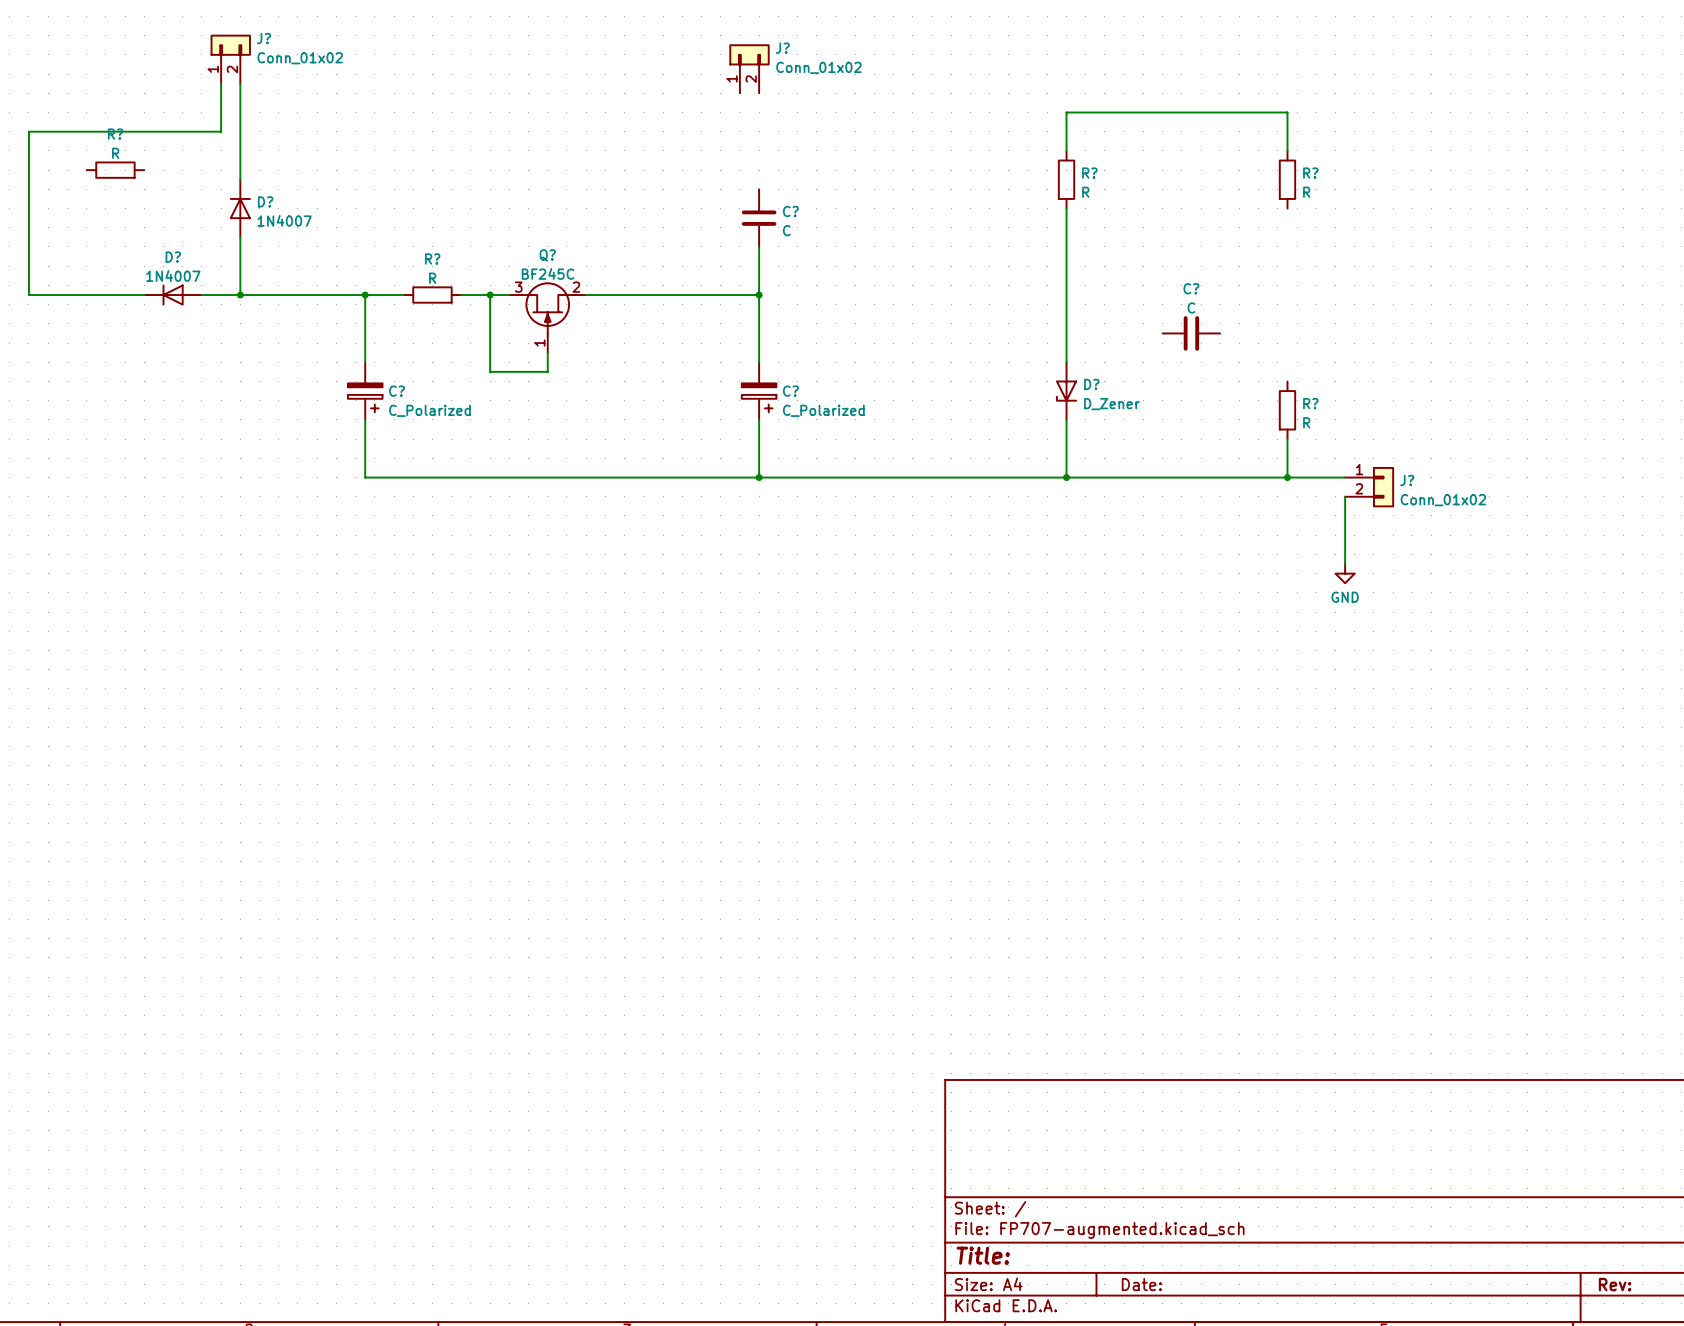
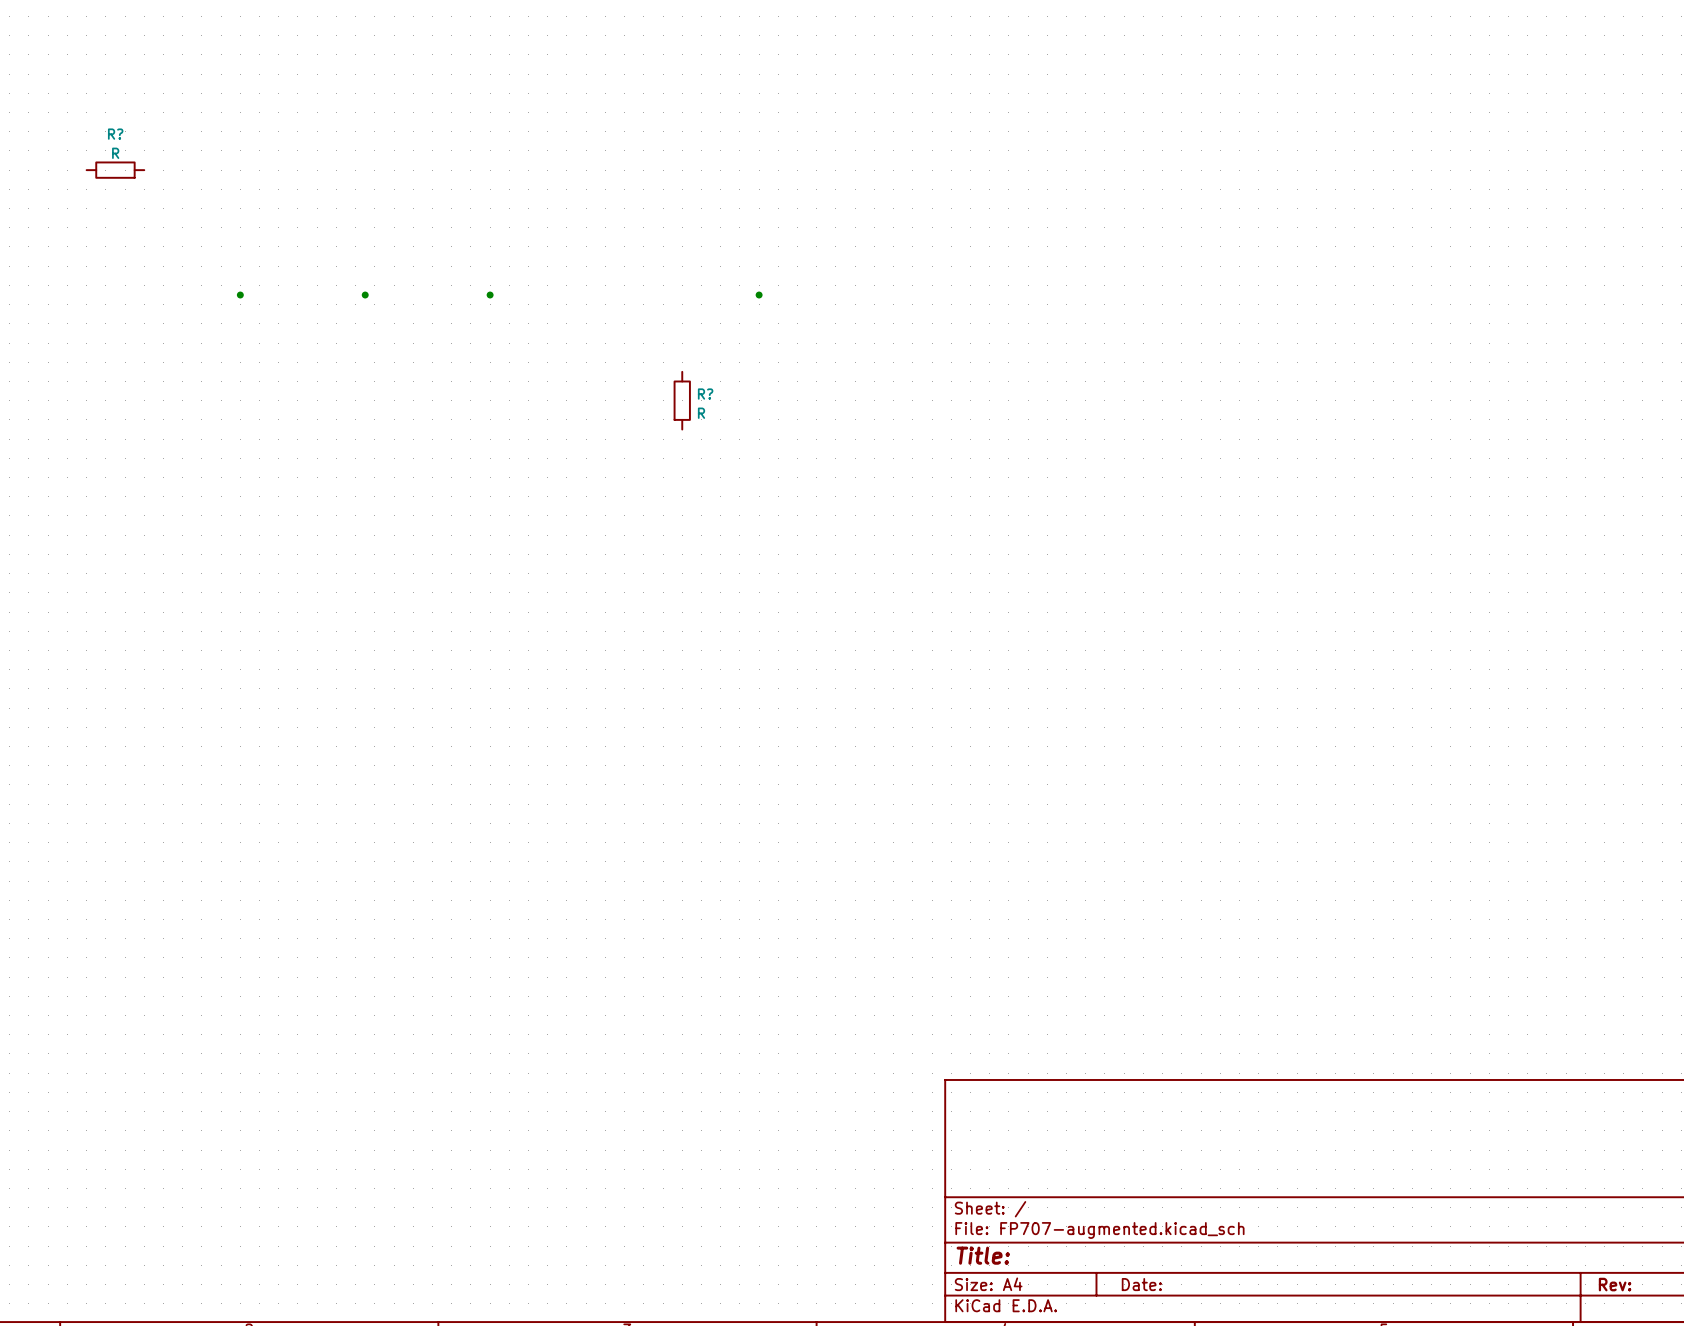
J?: Conn_01x02 (230, 59) -> none
J?: Conn_01x02 (749, 68) -> none
wire: (221, 83) (221, 131) (28, 131) (28, 295) (144, 295) -> none
wire: (240, 83) (240, 179) -> none
wire: (1066, 150) (1066, 112) (1287, 112) (1287, 150) -> none
R?: R (1066, 179) -> none
R?: R (1287, 179) -> none
D?: 1N4007 (240, 208) -> none
wire: (1066, 208) (1066, 362) -> none
C?: C (759, 218) -> none
wire: (240, 237) (240, 295) -> none
wire: (759, 246) (759, 362) -> none
D?: 1N4007 (173, 295) -> none
wire: (201, 295) (403, 295) -> none
wire: (365, 295) (365, 362) -> none
R?: R (432, 295) -> none
wire: (461, 295) (509, 295) -> none
wire: (490, 295) (490, 371) (547, 371) (547, 352) -> none
wire: (586, 295) (759, 295) -> none
Q?: BF245C (547, 317) -> none
C?: C (1191, 333) -> none
C?: C_Polarized (365, 391) -> none
C?: C_Polarized (759, 391) -> none
D?: D_Zener (1066, 391) -> none
R?: none -> R (682, 400)
R?: R (1287, 410) -> none
wire: (365, 419) (365, 477) (1345, 477) -> none
wire: (759, 419) (759, 477) -> none
wire: (1066, 419) (1066, 477) -> none
wire: (1287, 439) (1287, 477) -> none
junction: (759, 477) -> none
junction: (1066, 477) -> none
junction: (1287, 477) -> none
J?: Conn_01x02 (1369, 487) -> none
wire: (1345, 496) (1345, 564) -> none
power symbol: GND (1345, 573) -> none

